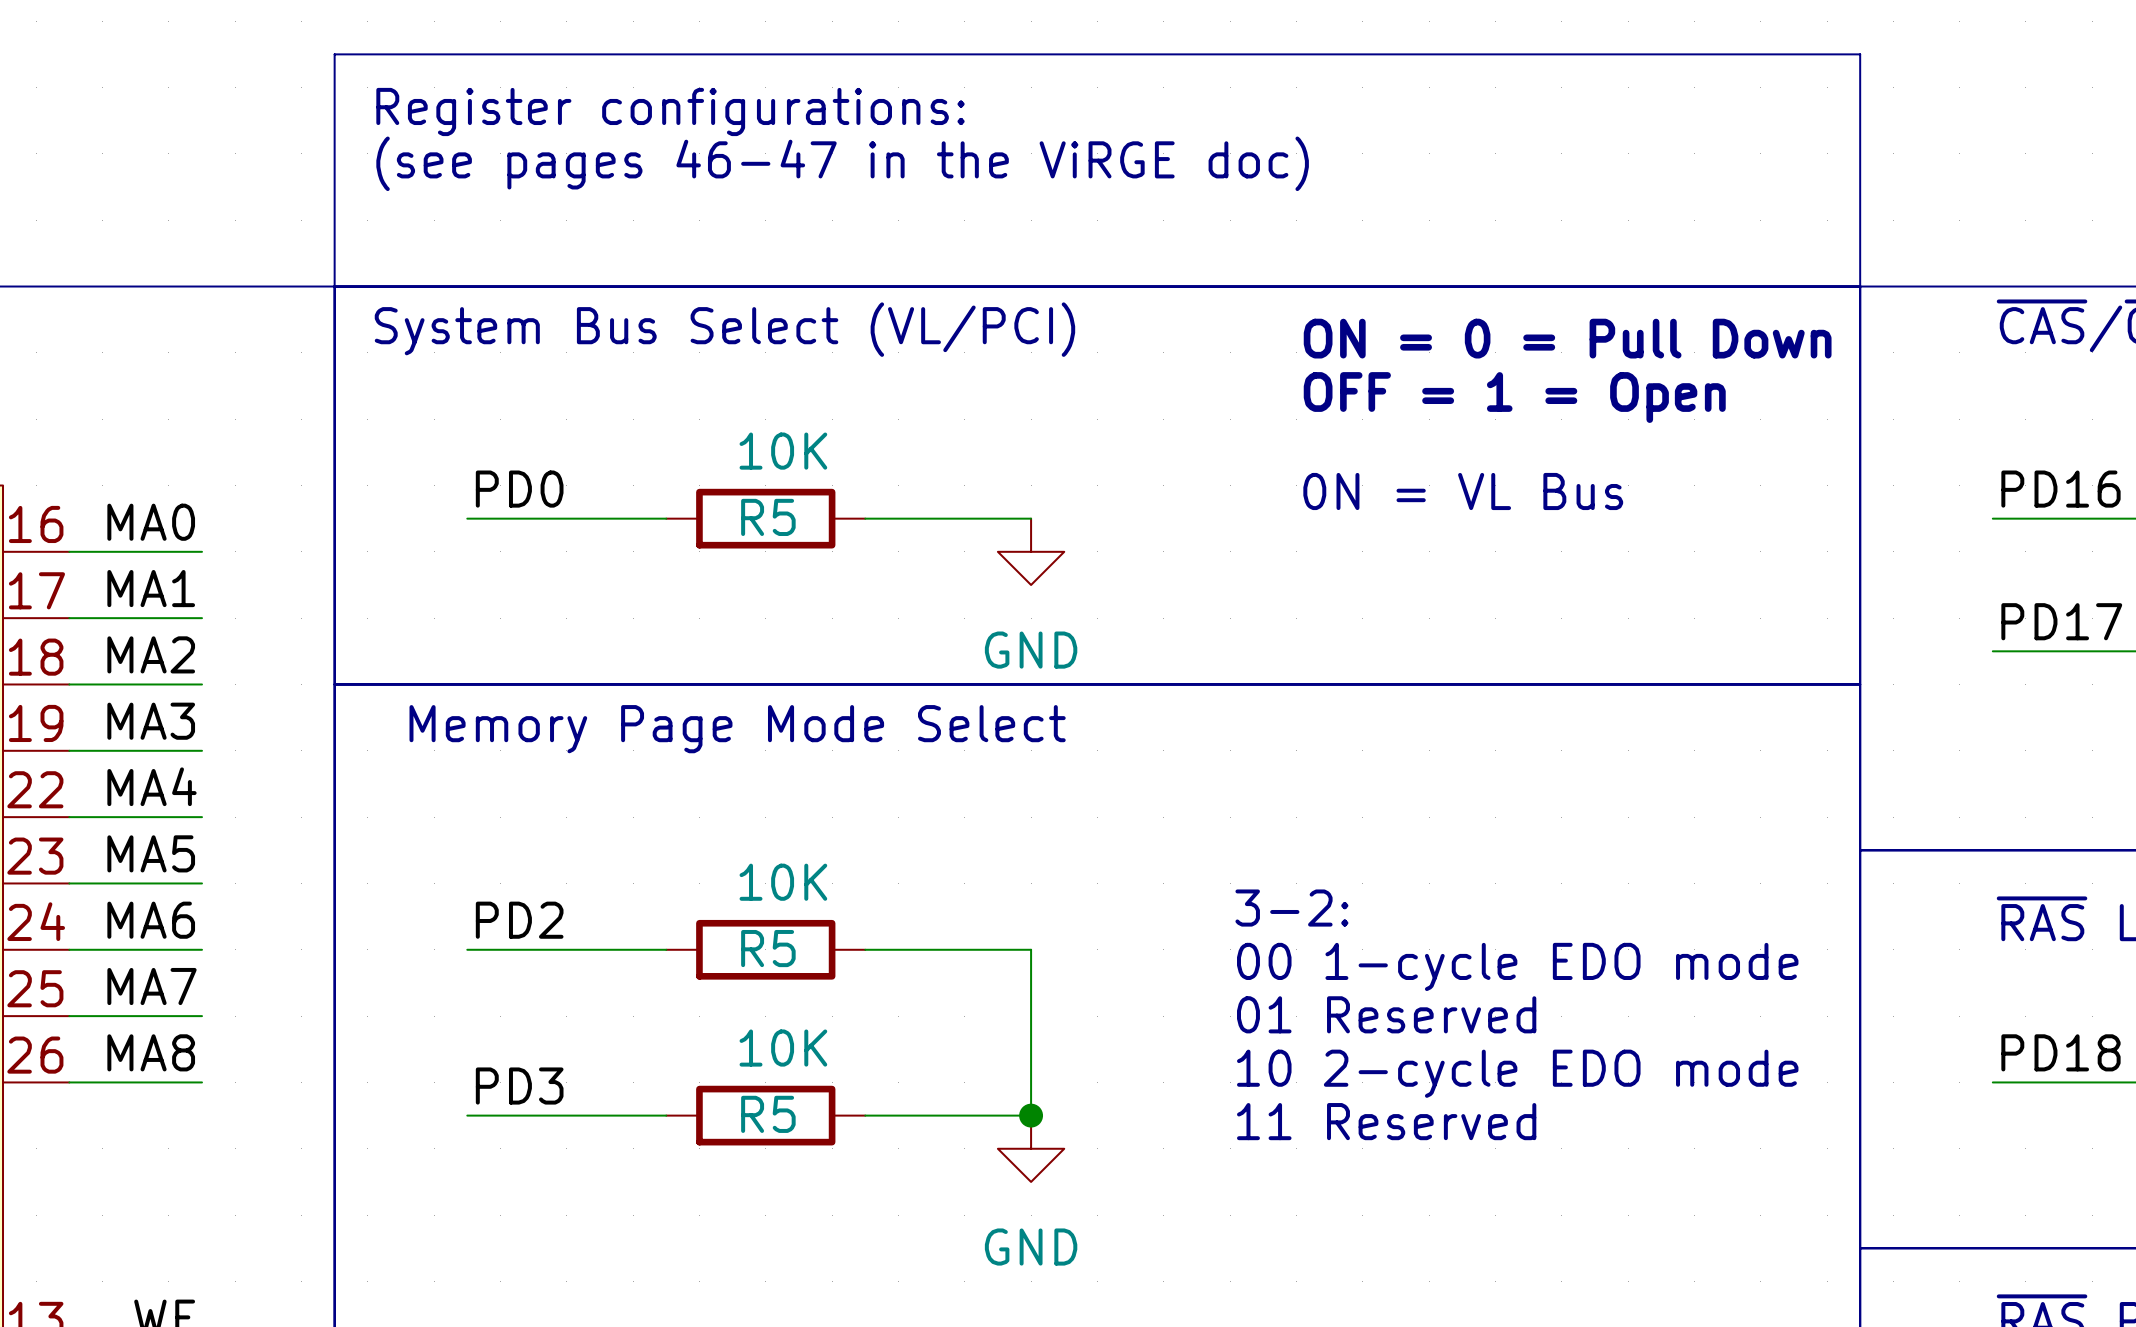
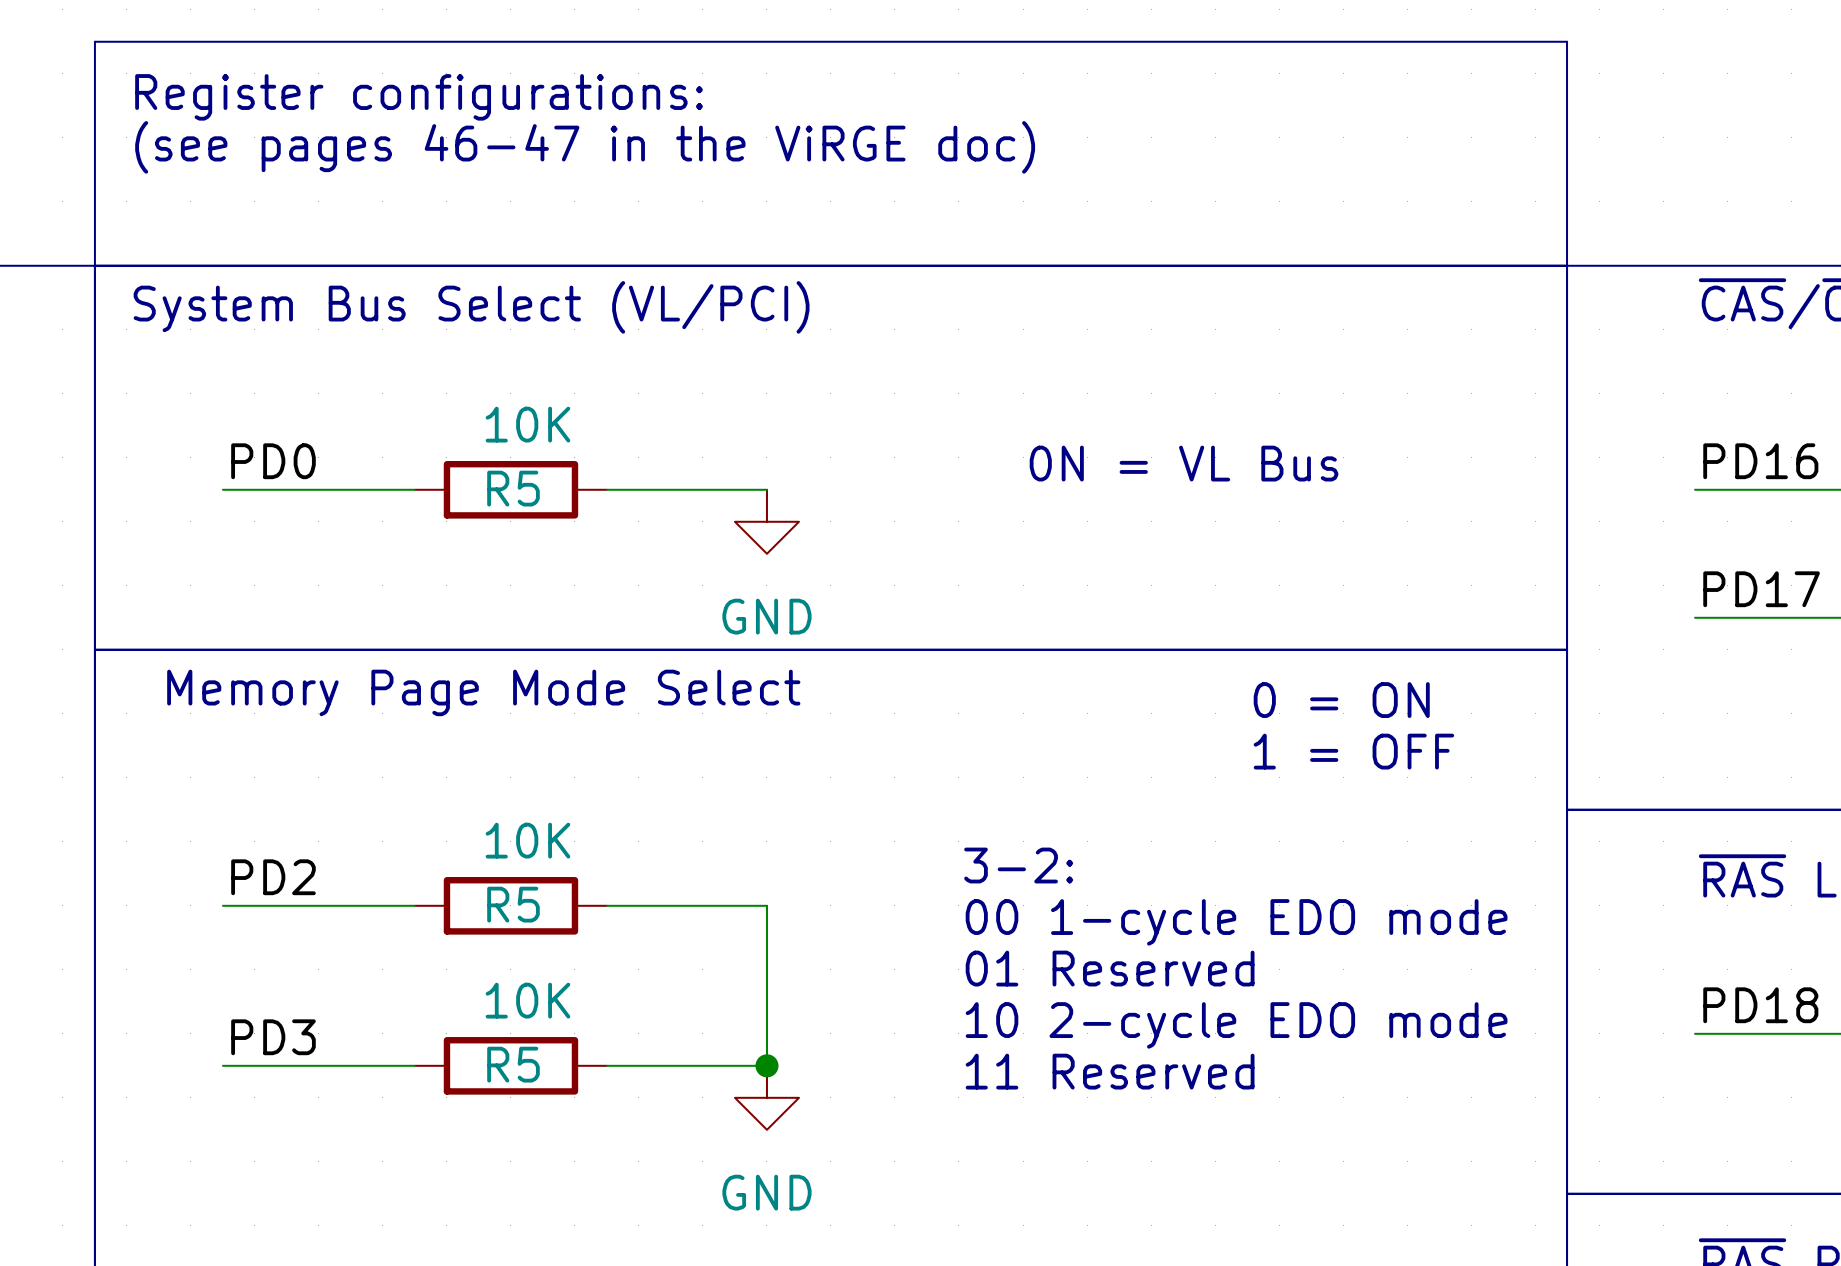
text: ON = 0 = Pull Down (1567, 338) -> none
text: OFF = 1 = Open (1514, 397) -> none
text: none -> 0 = ON (1341, 700)
text: none -> 1 = OFF (1353, 751)

